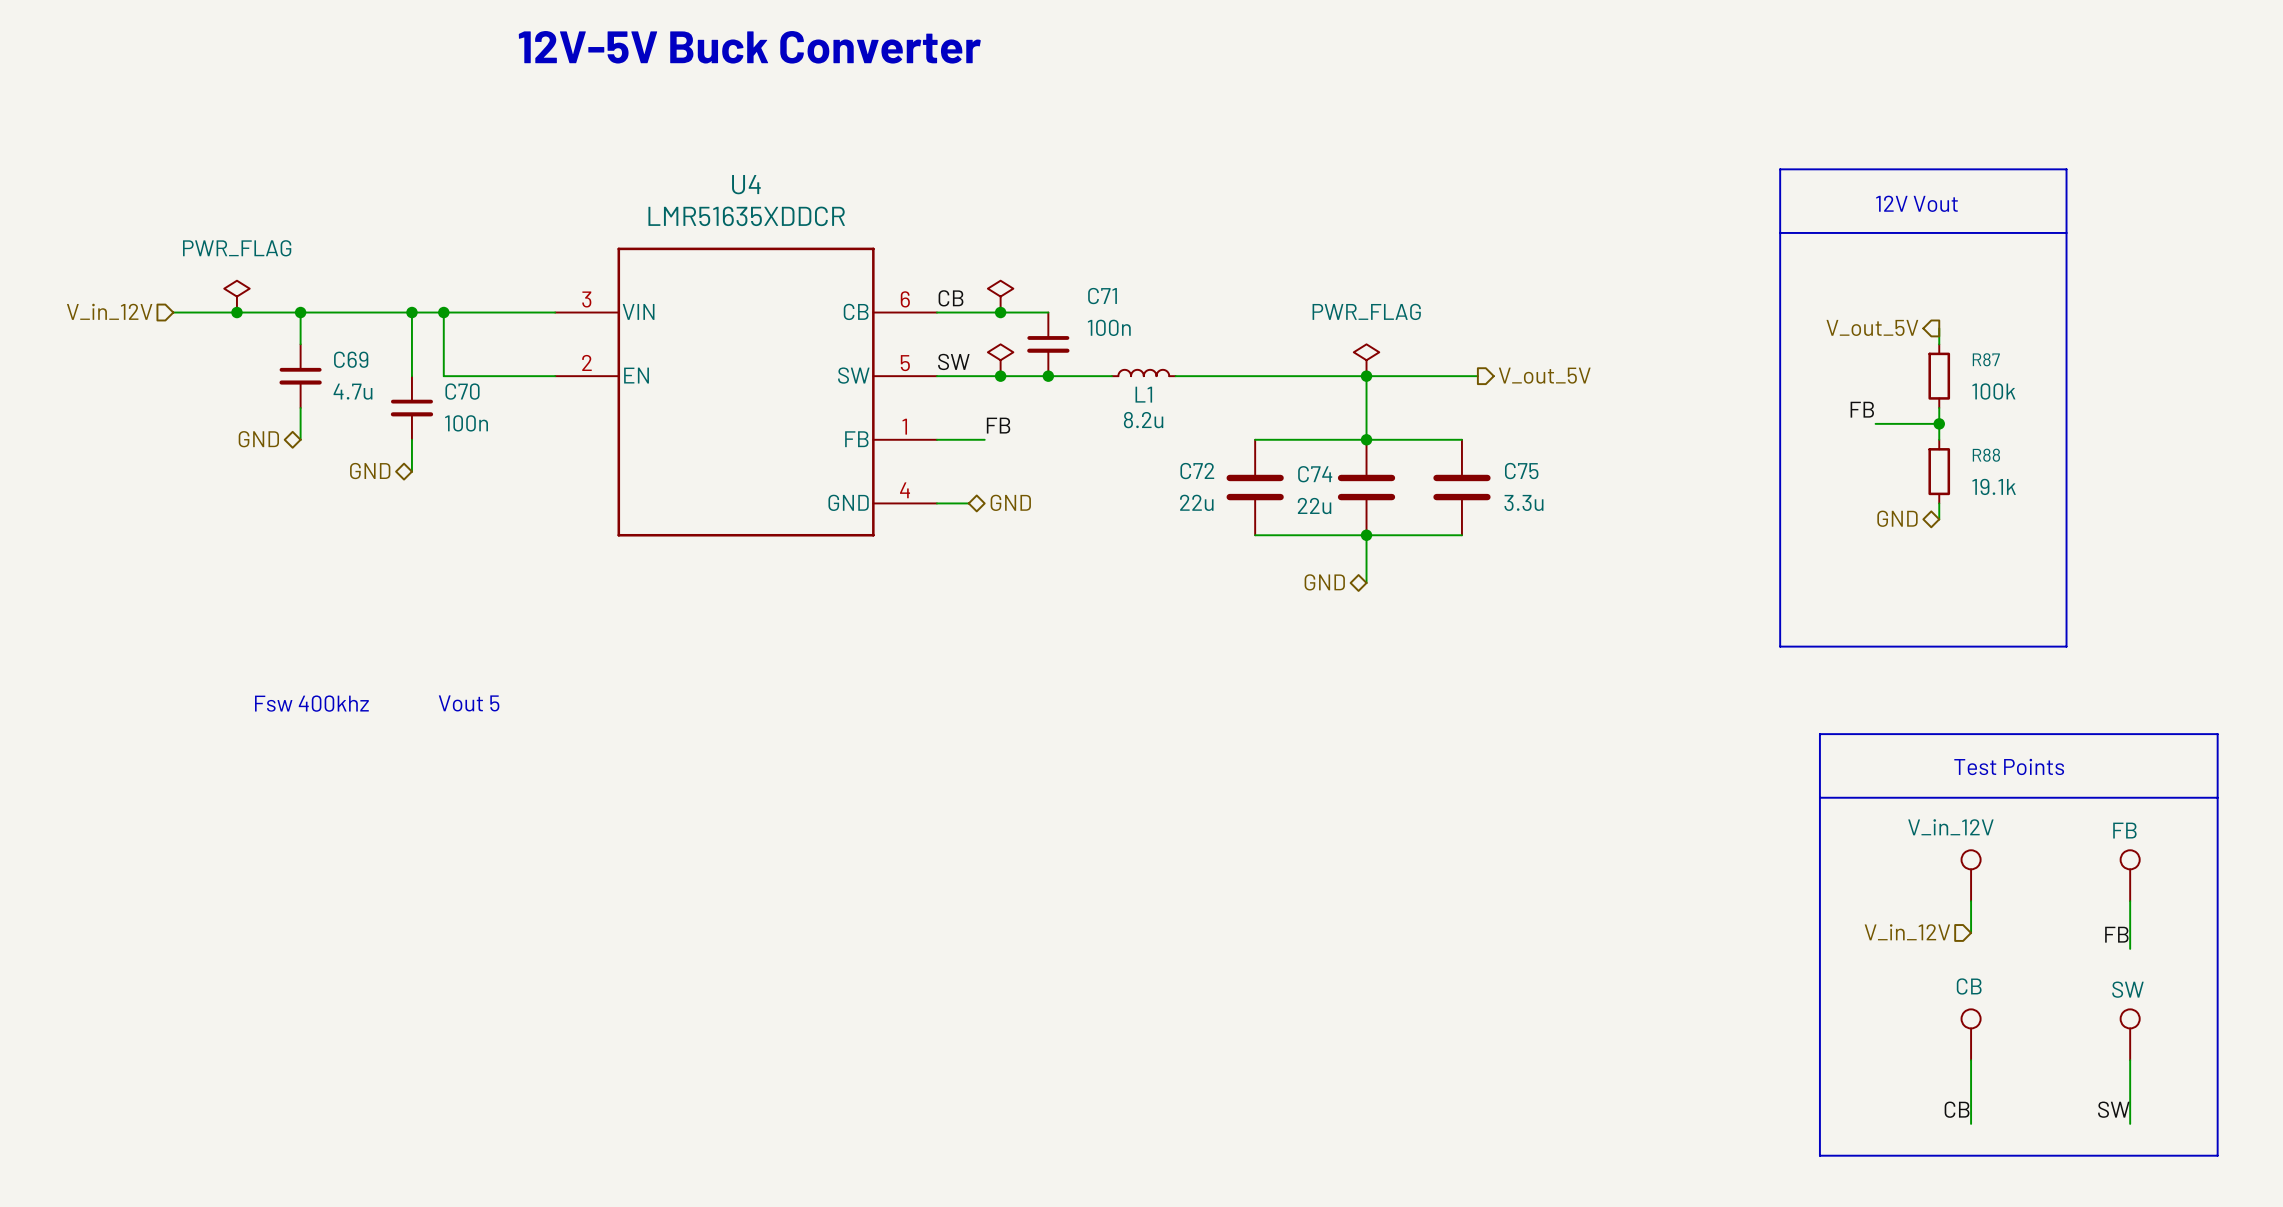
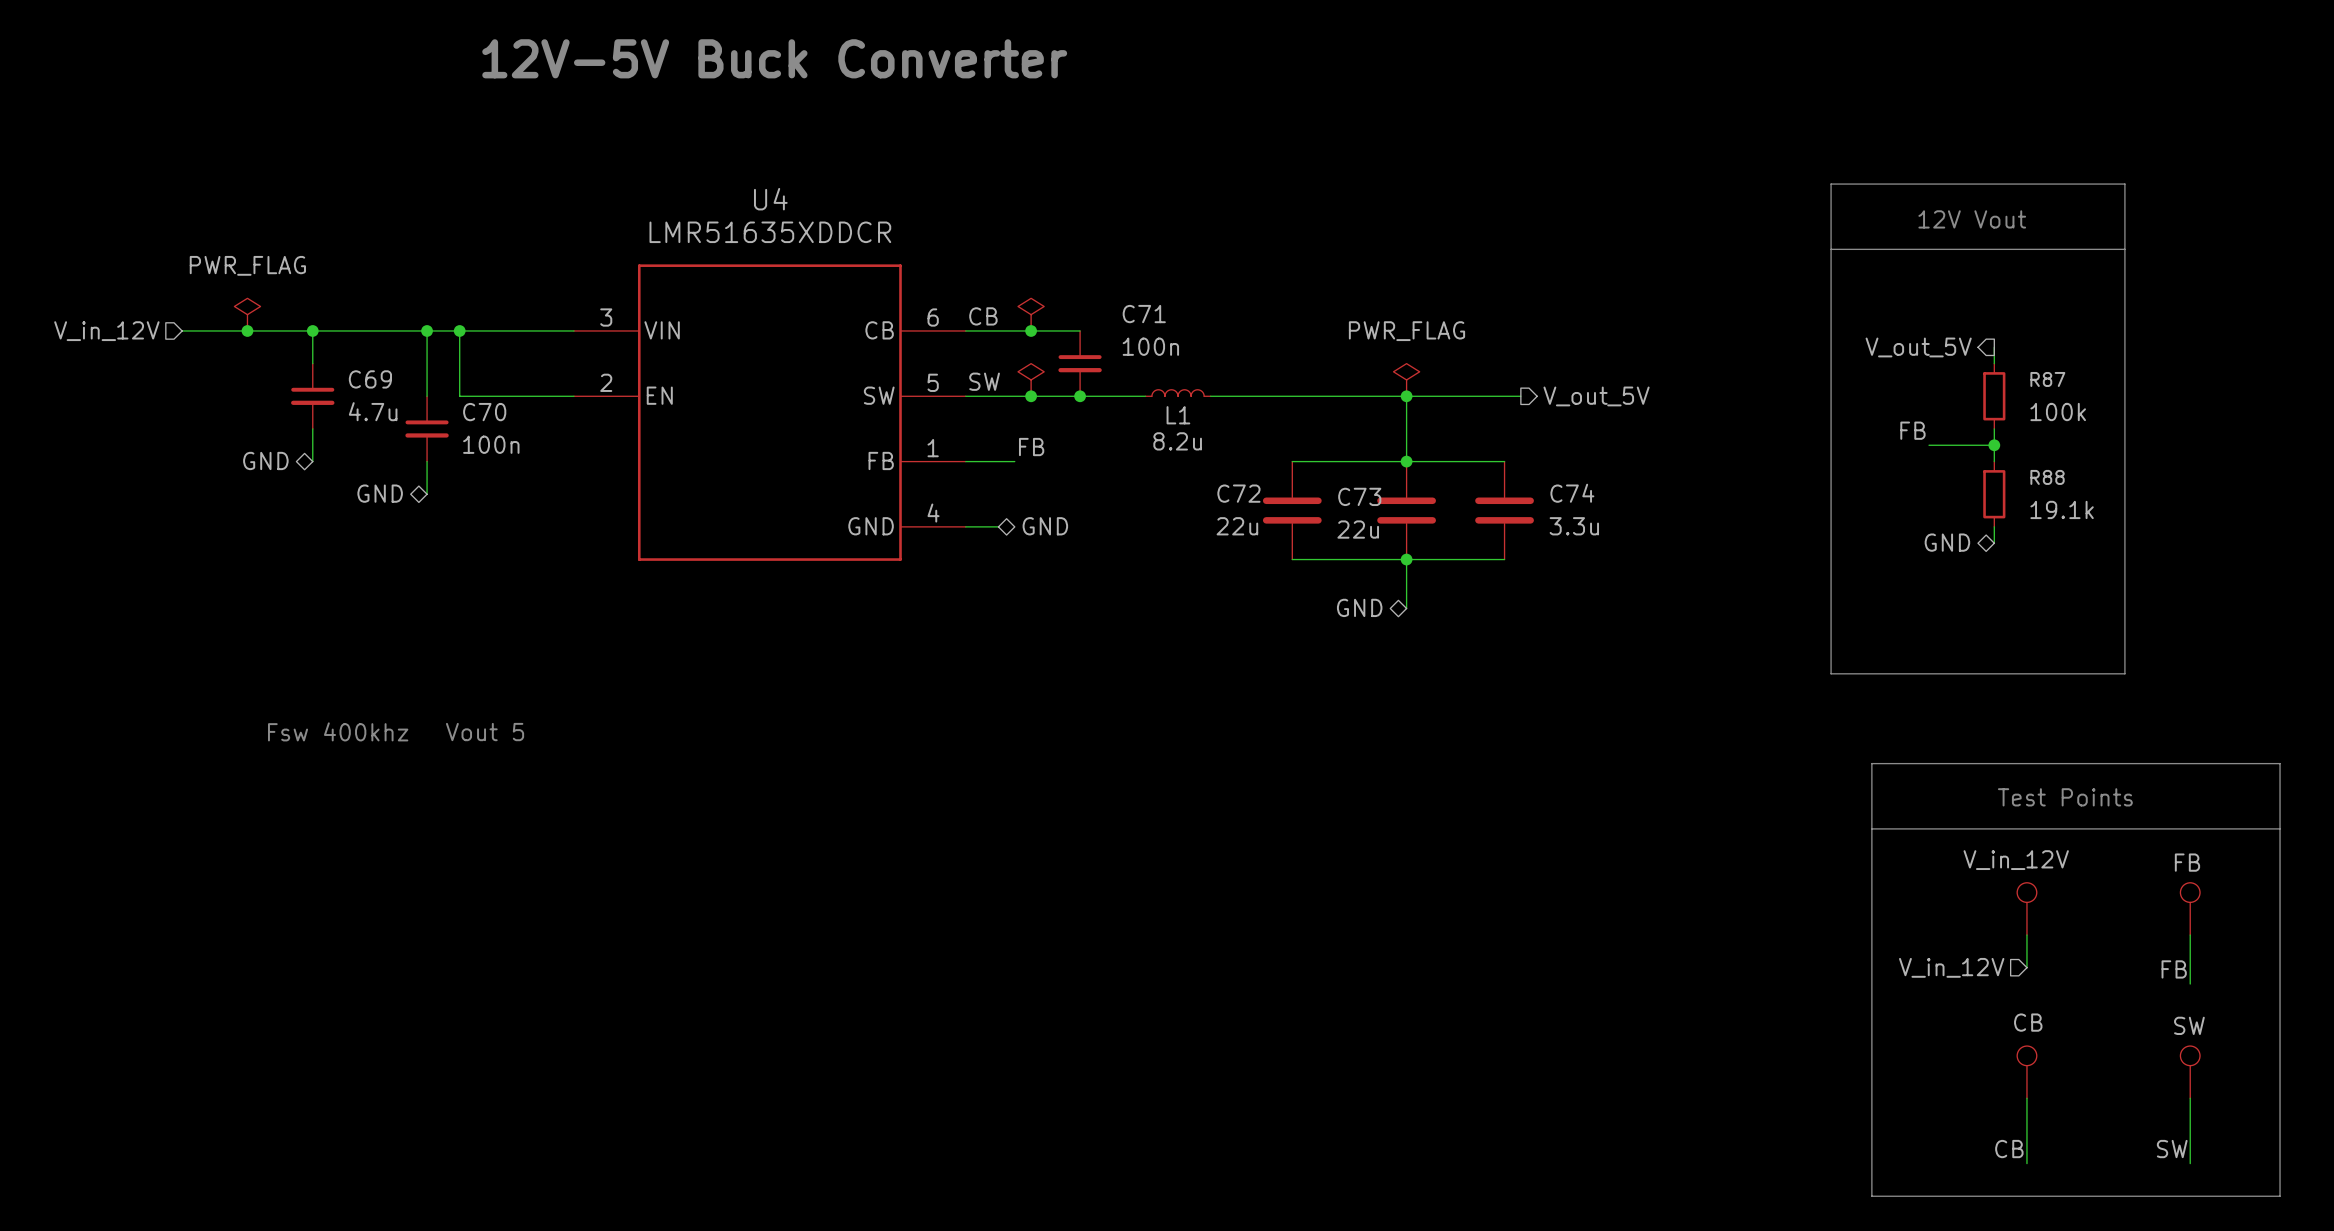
C75 name: C75 (1521, 471) -> C74 (1572, 493)
C74 name: C74 (1315, 474) -> C73 (1359, 496)

